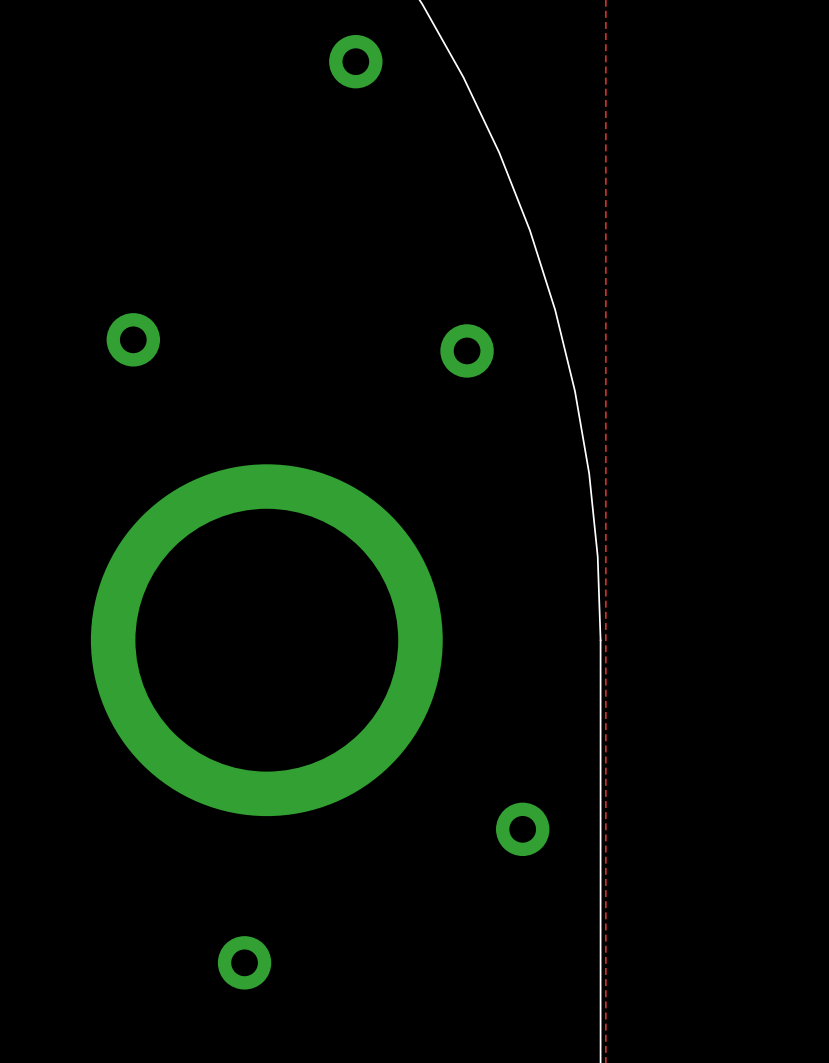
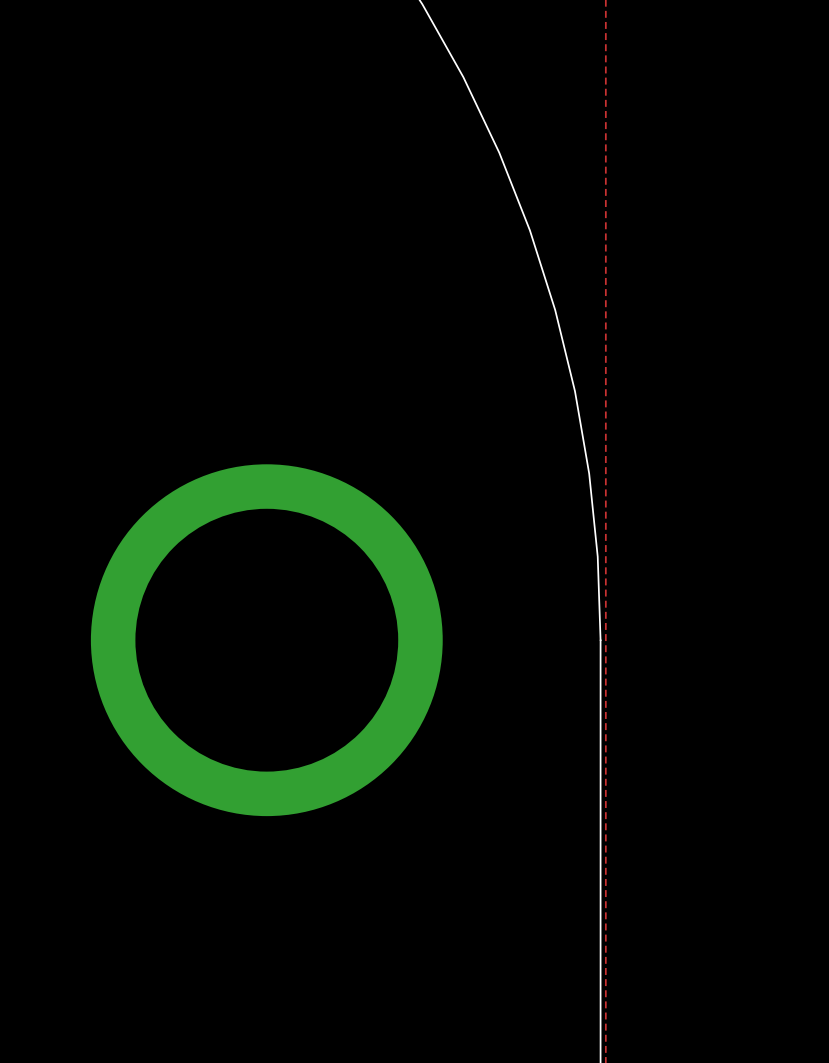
via: (355, 61) -> none
via: (133, 339) -> none
via: (467, 350) -> none
via: (522, 829) -> none
via: (244, 962) -> none

